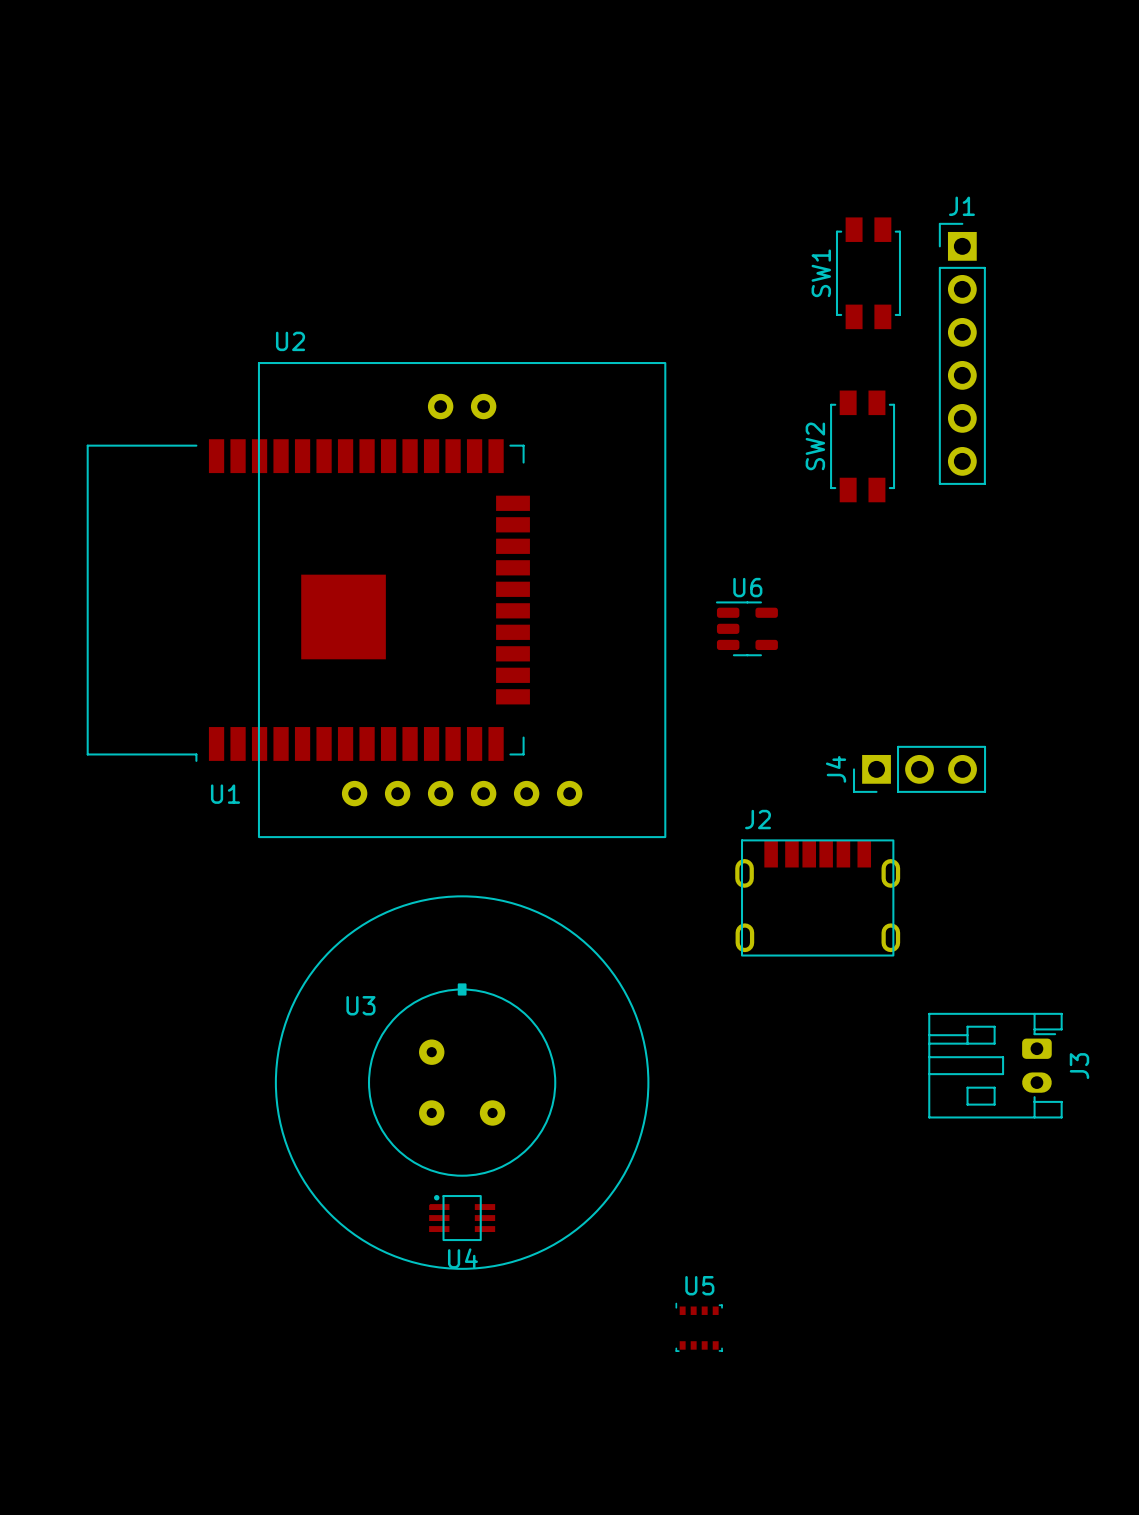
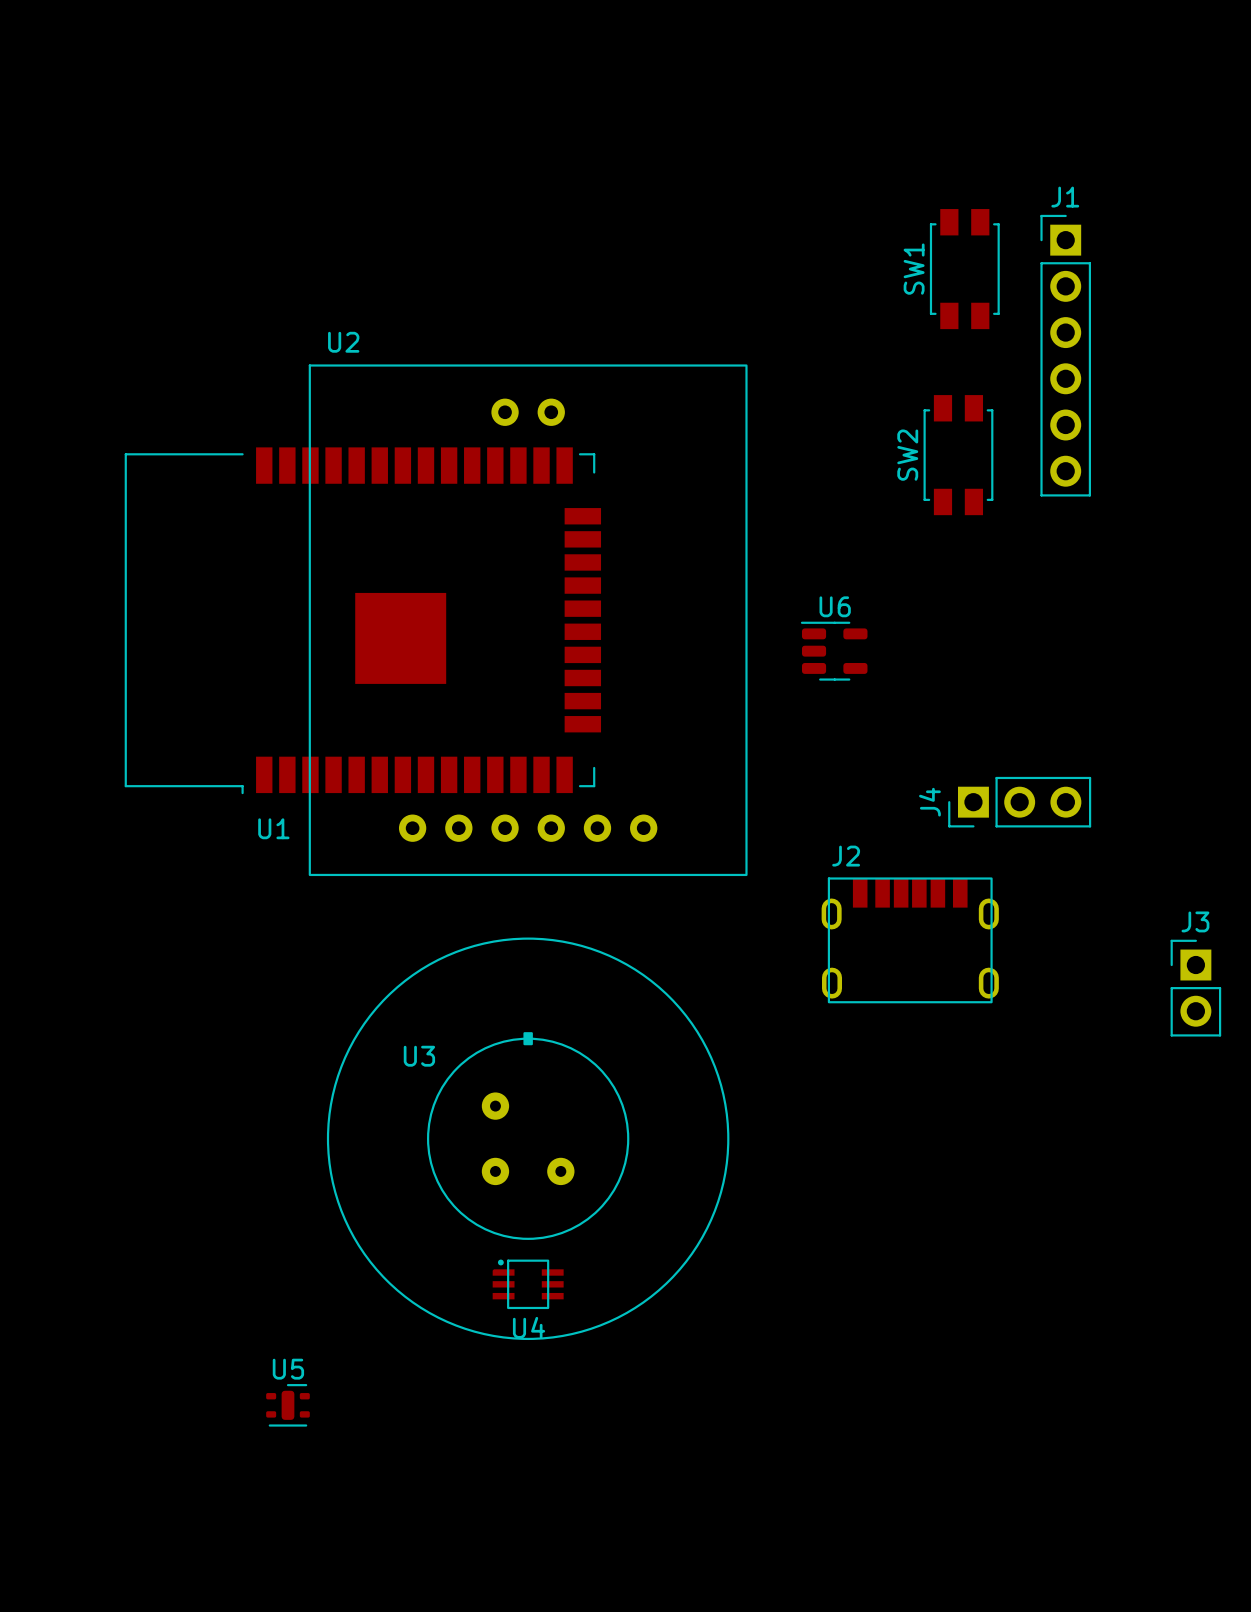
J3 footprint: [928, 1012, 1063, 1119] -> [1170, 939, 1222, 1037]
J3 name position: J3 (1079, 1066) -> J3 (1195, 921)
U5 footprint: [675, 1302, 723, 1352] -> [266, 1384, 310, 1427]

